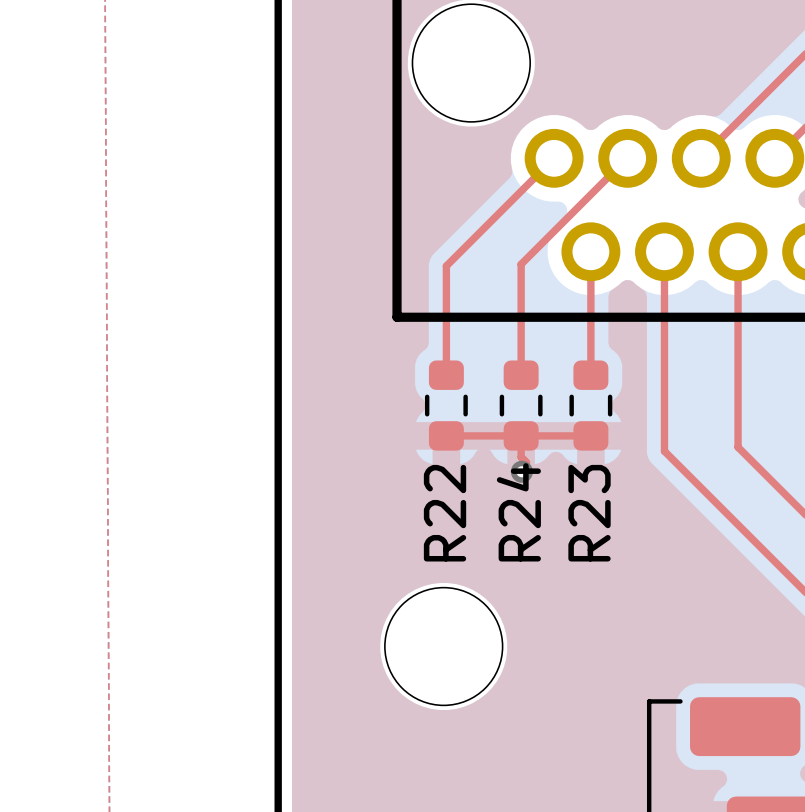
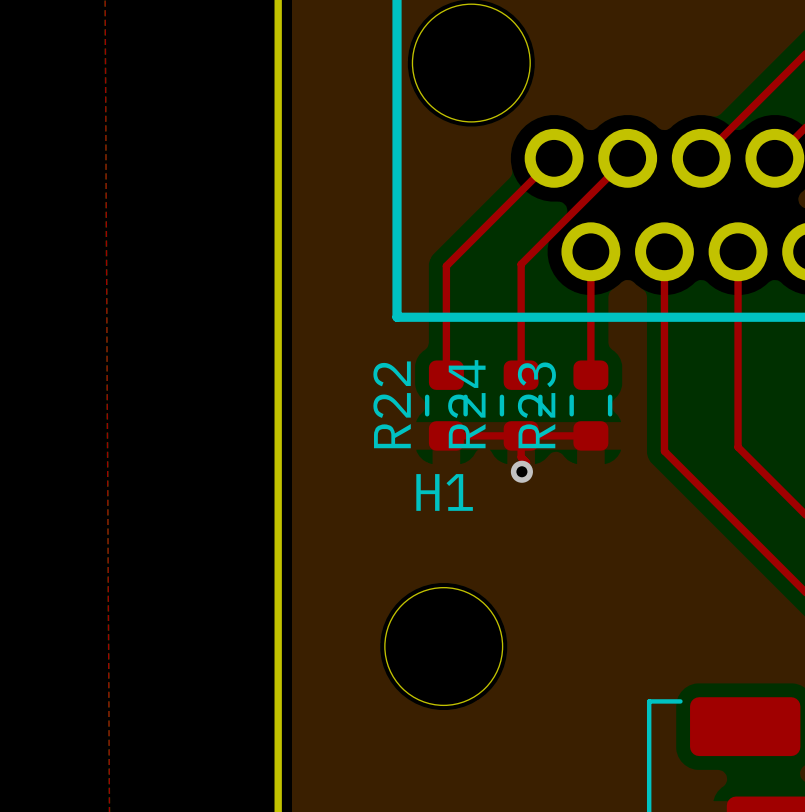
H1 name: none -> H1 (444, 492)
R24 name position: R24 (518, 512) -> R24 (466, 404)
R22 name position: R22 (445, 513) -> R22 (392, 404)
R23 name position: R23 (589, 513) -> R23 (536, 405)

